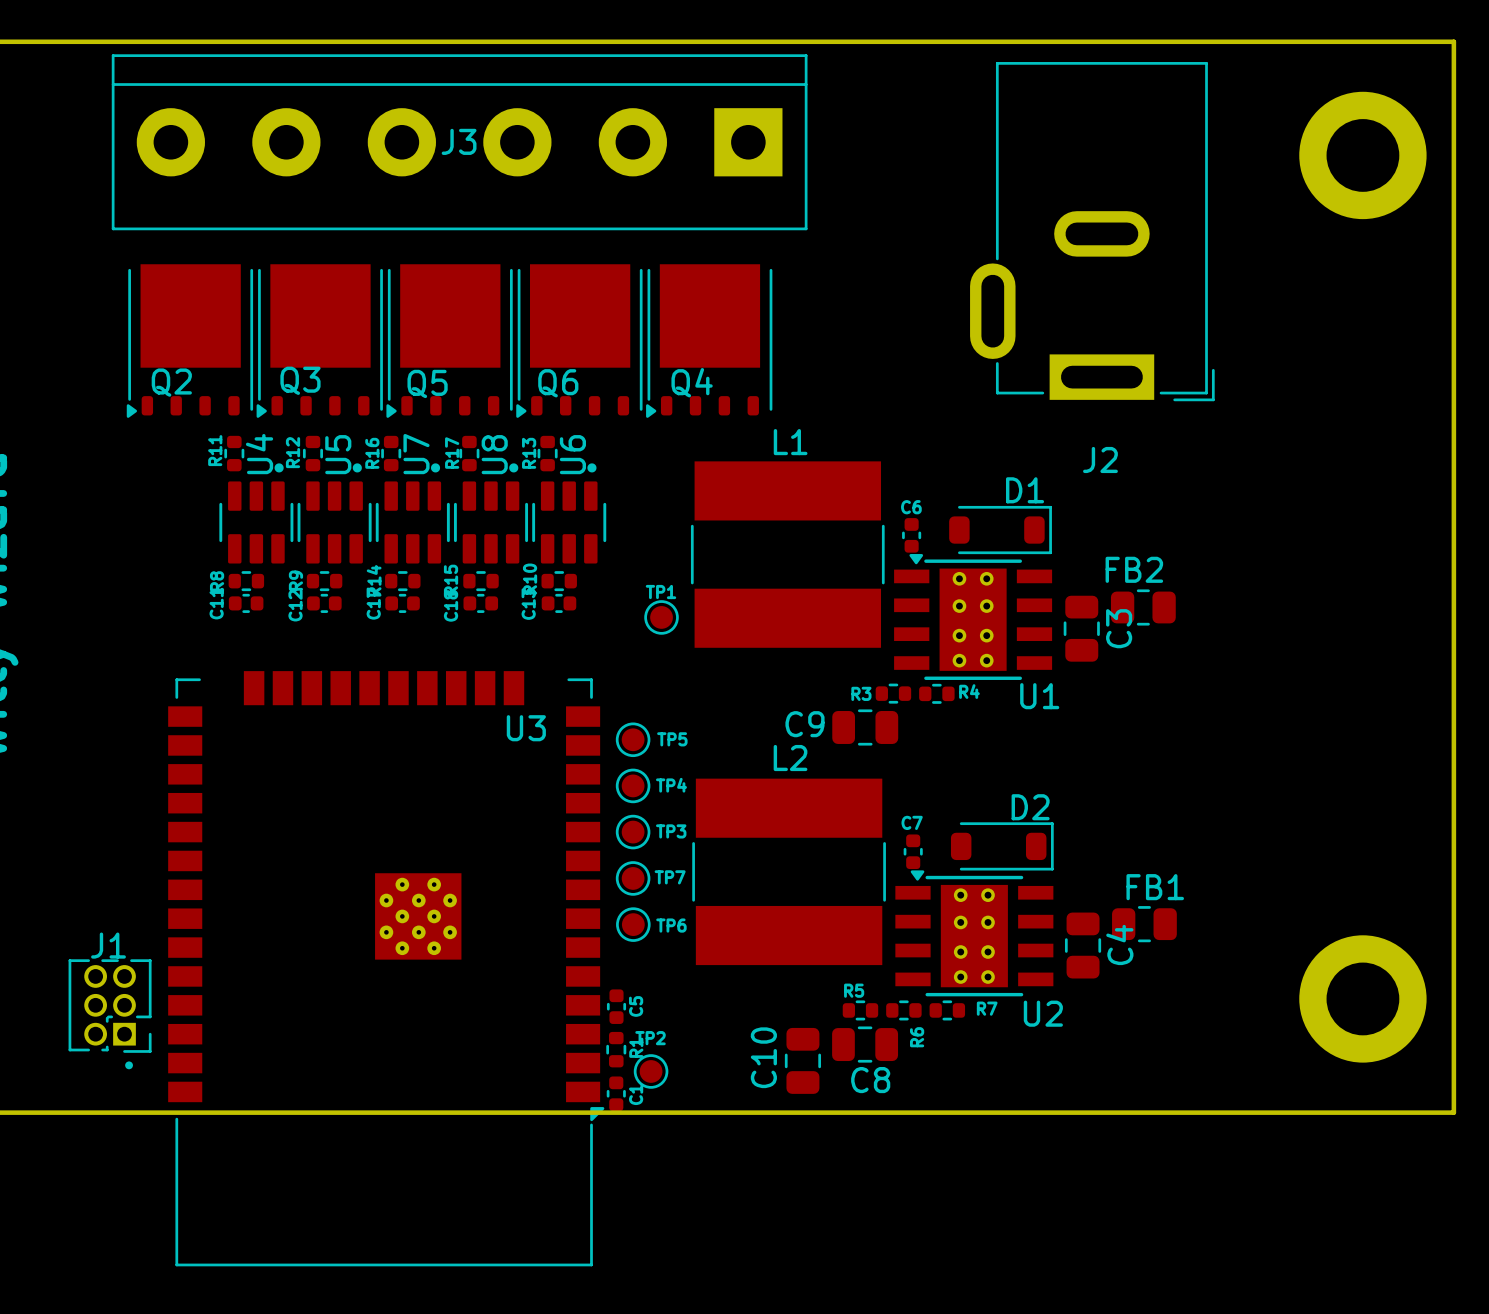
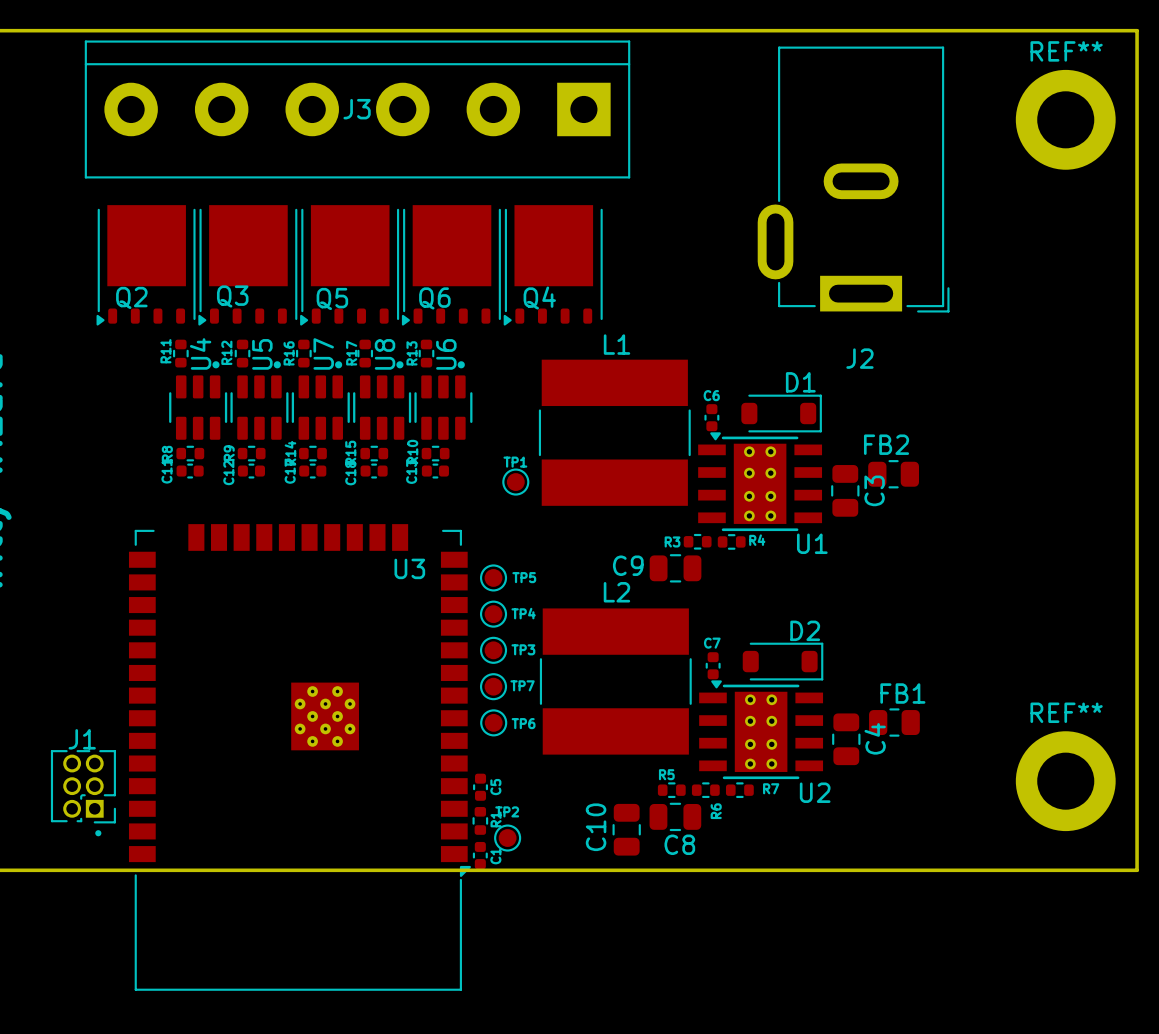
REF** name: none -> REF** (1066, 51)
REF** name: none -> REF** (1066, 712)

